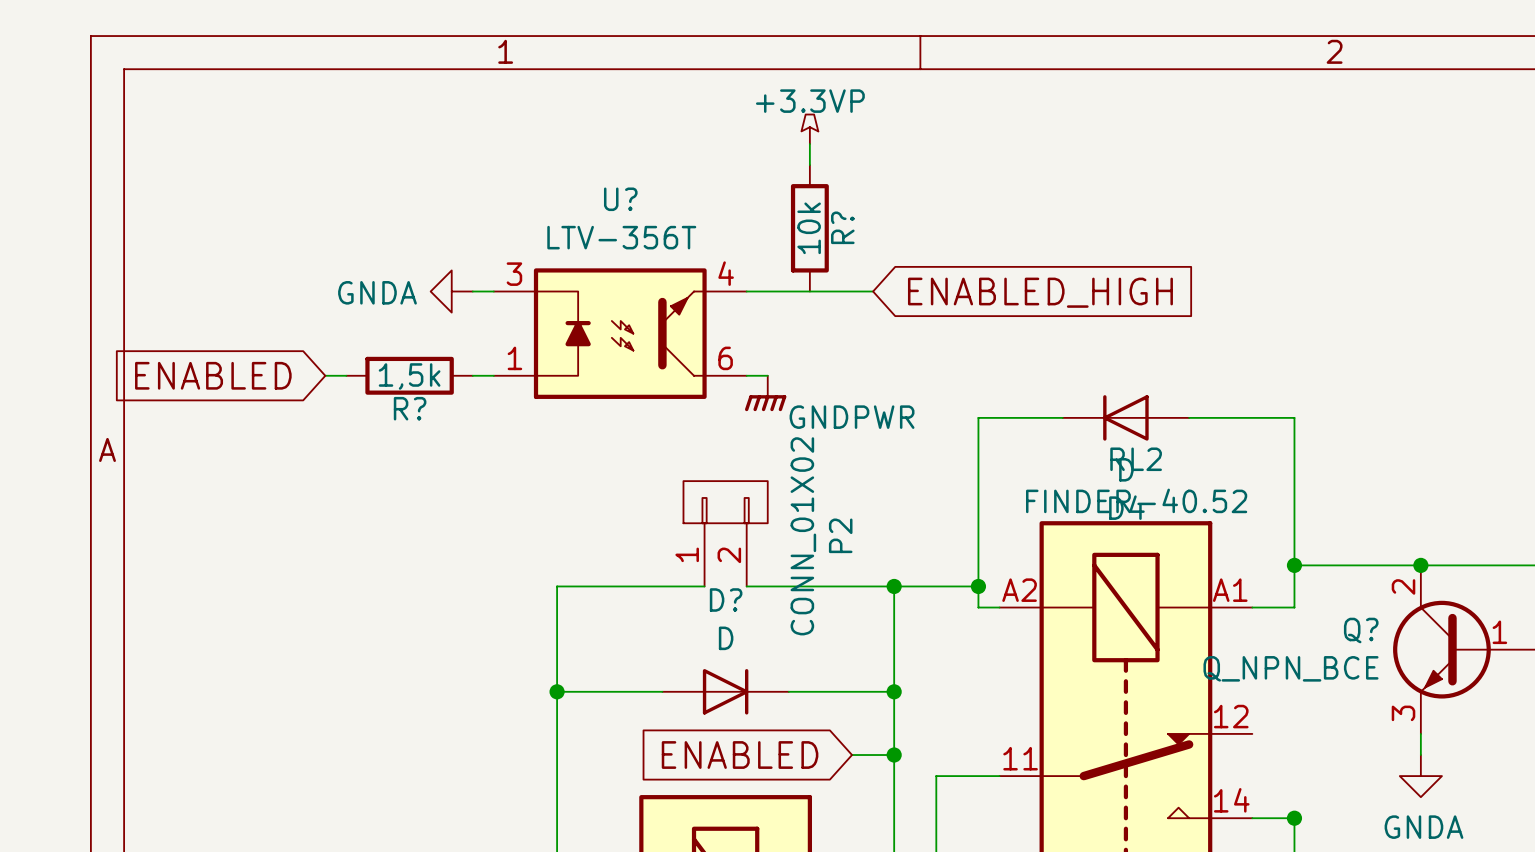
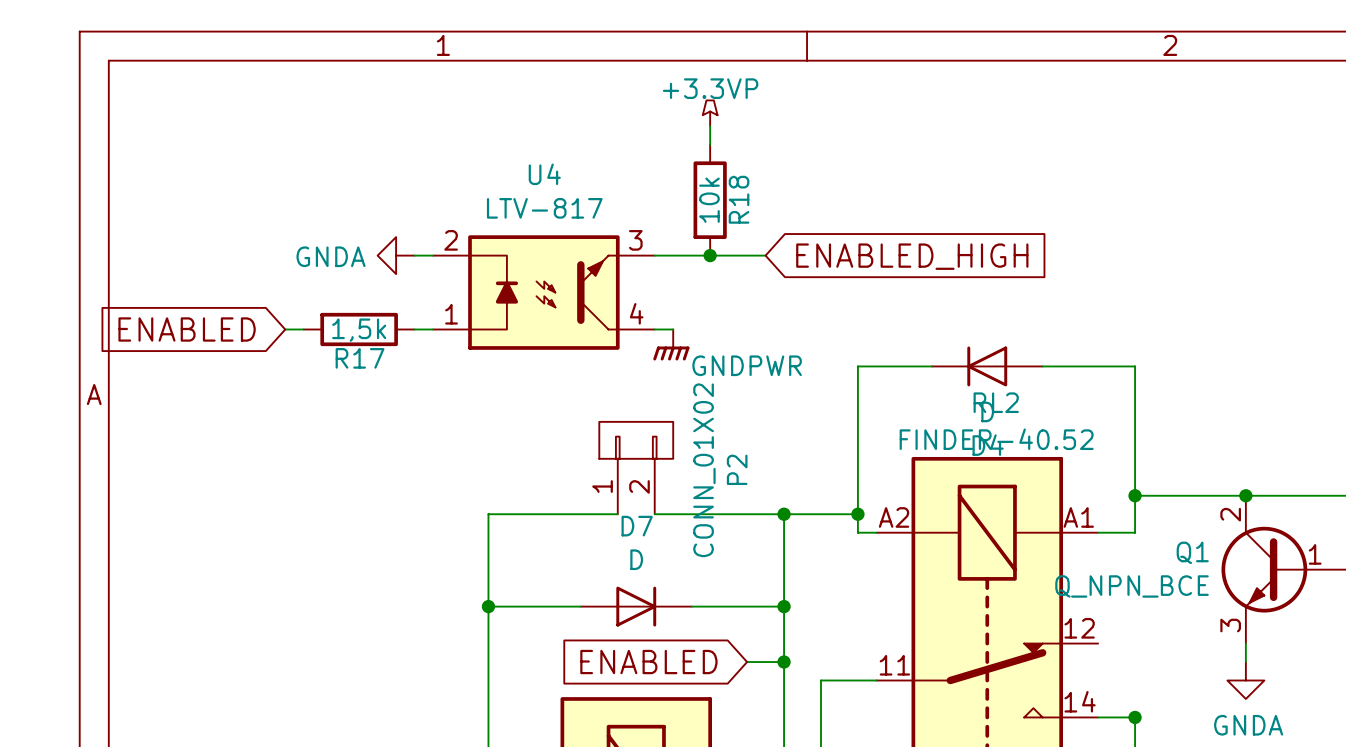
U? name: U? (620, 199) -> U4 (544, 174)
R? name: R? (842, 227) -> R18 (739, 199)
U? value: LTV-356T (621, 237) -> LTV-817 (544, 208)
U? pin number: 4 (726, 273) -> 3 (635, 240)
U? pin number: 3 (514, 274) -> 2 (451, 240)
junction: none -> (710, 255)
U? pin number: 6 (725, 358) -> 4 (636, 313)
R? name: R? (410, 408) -> R17 (360, 358)
D? name: D? (726, 600) -> D7 (637, 526)
Q? name: Q? (1361, 630) -> Q1 (1192, 552)

